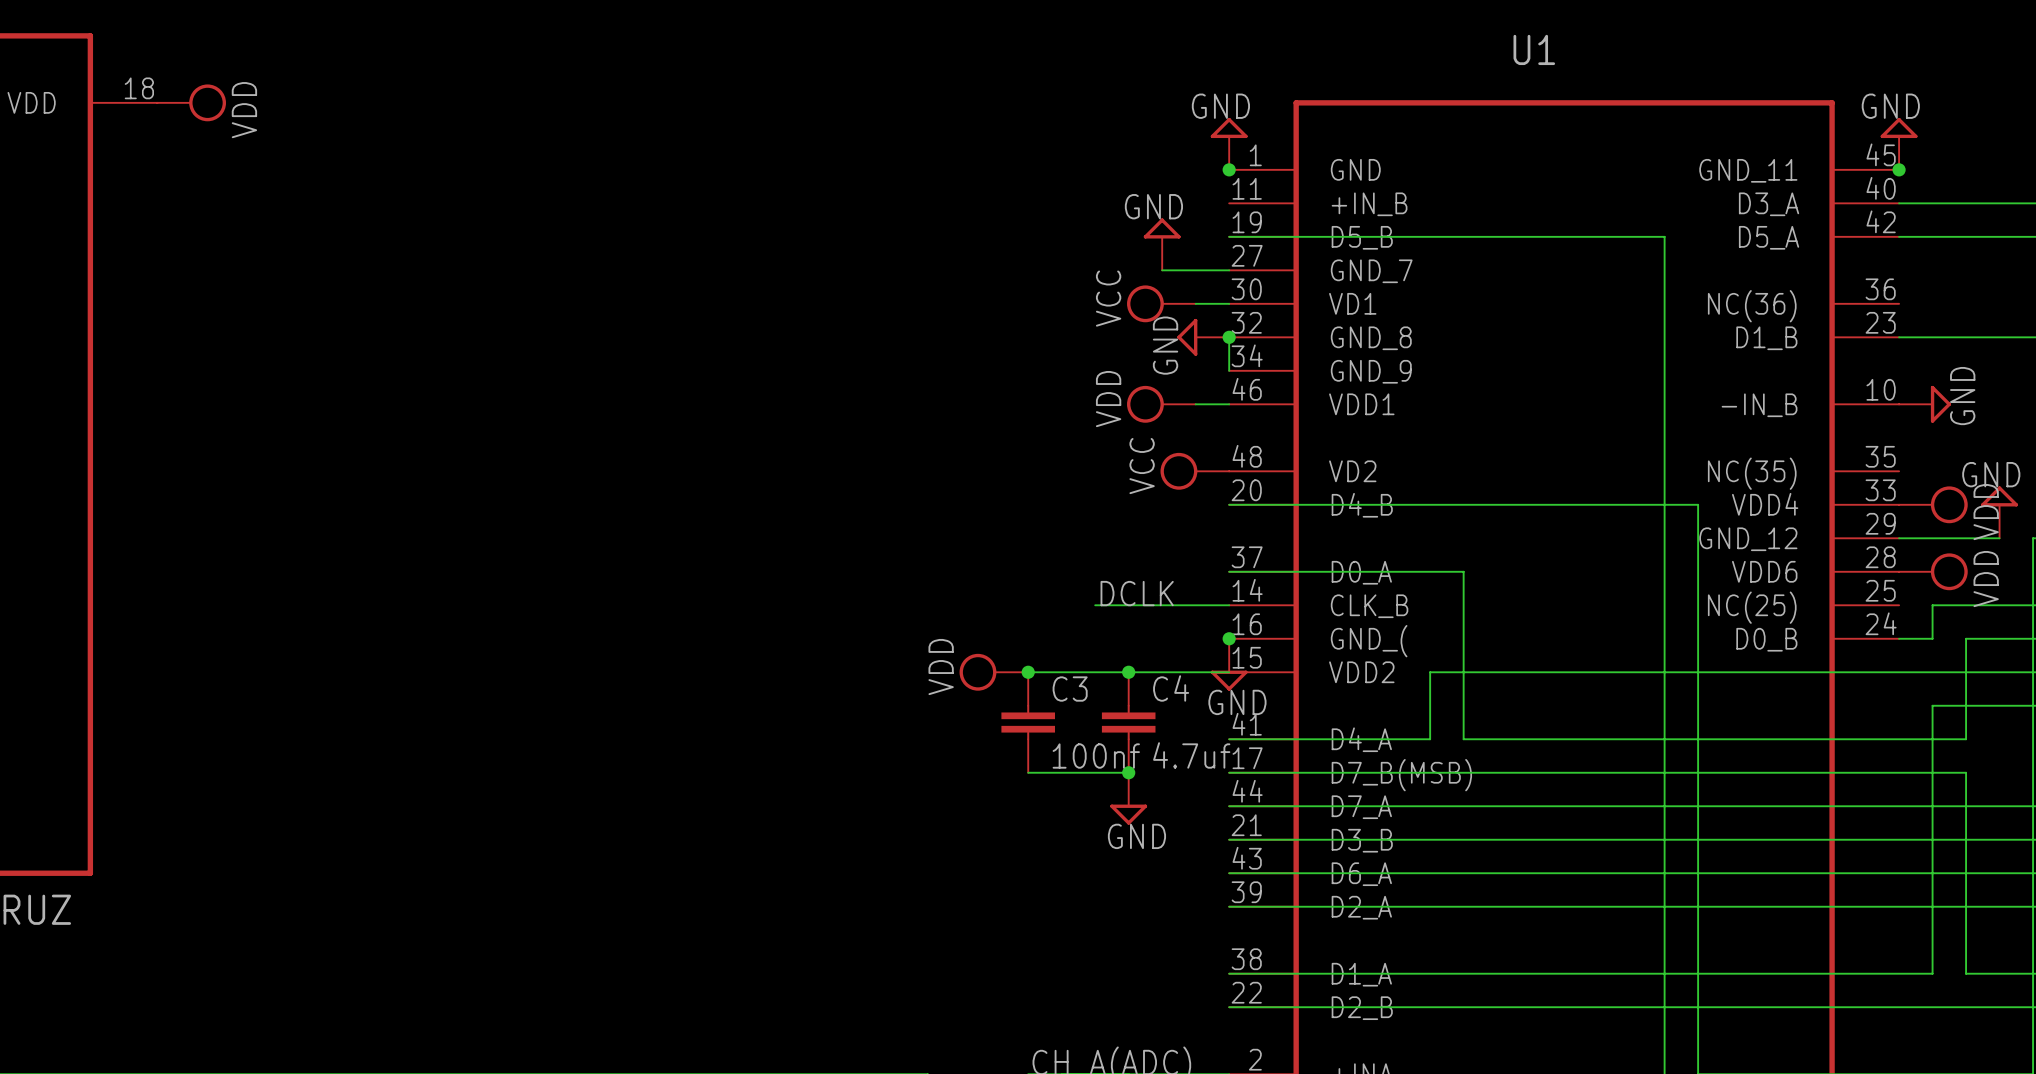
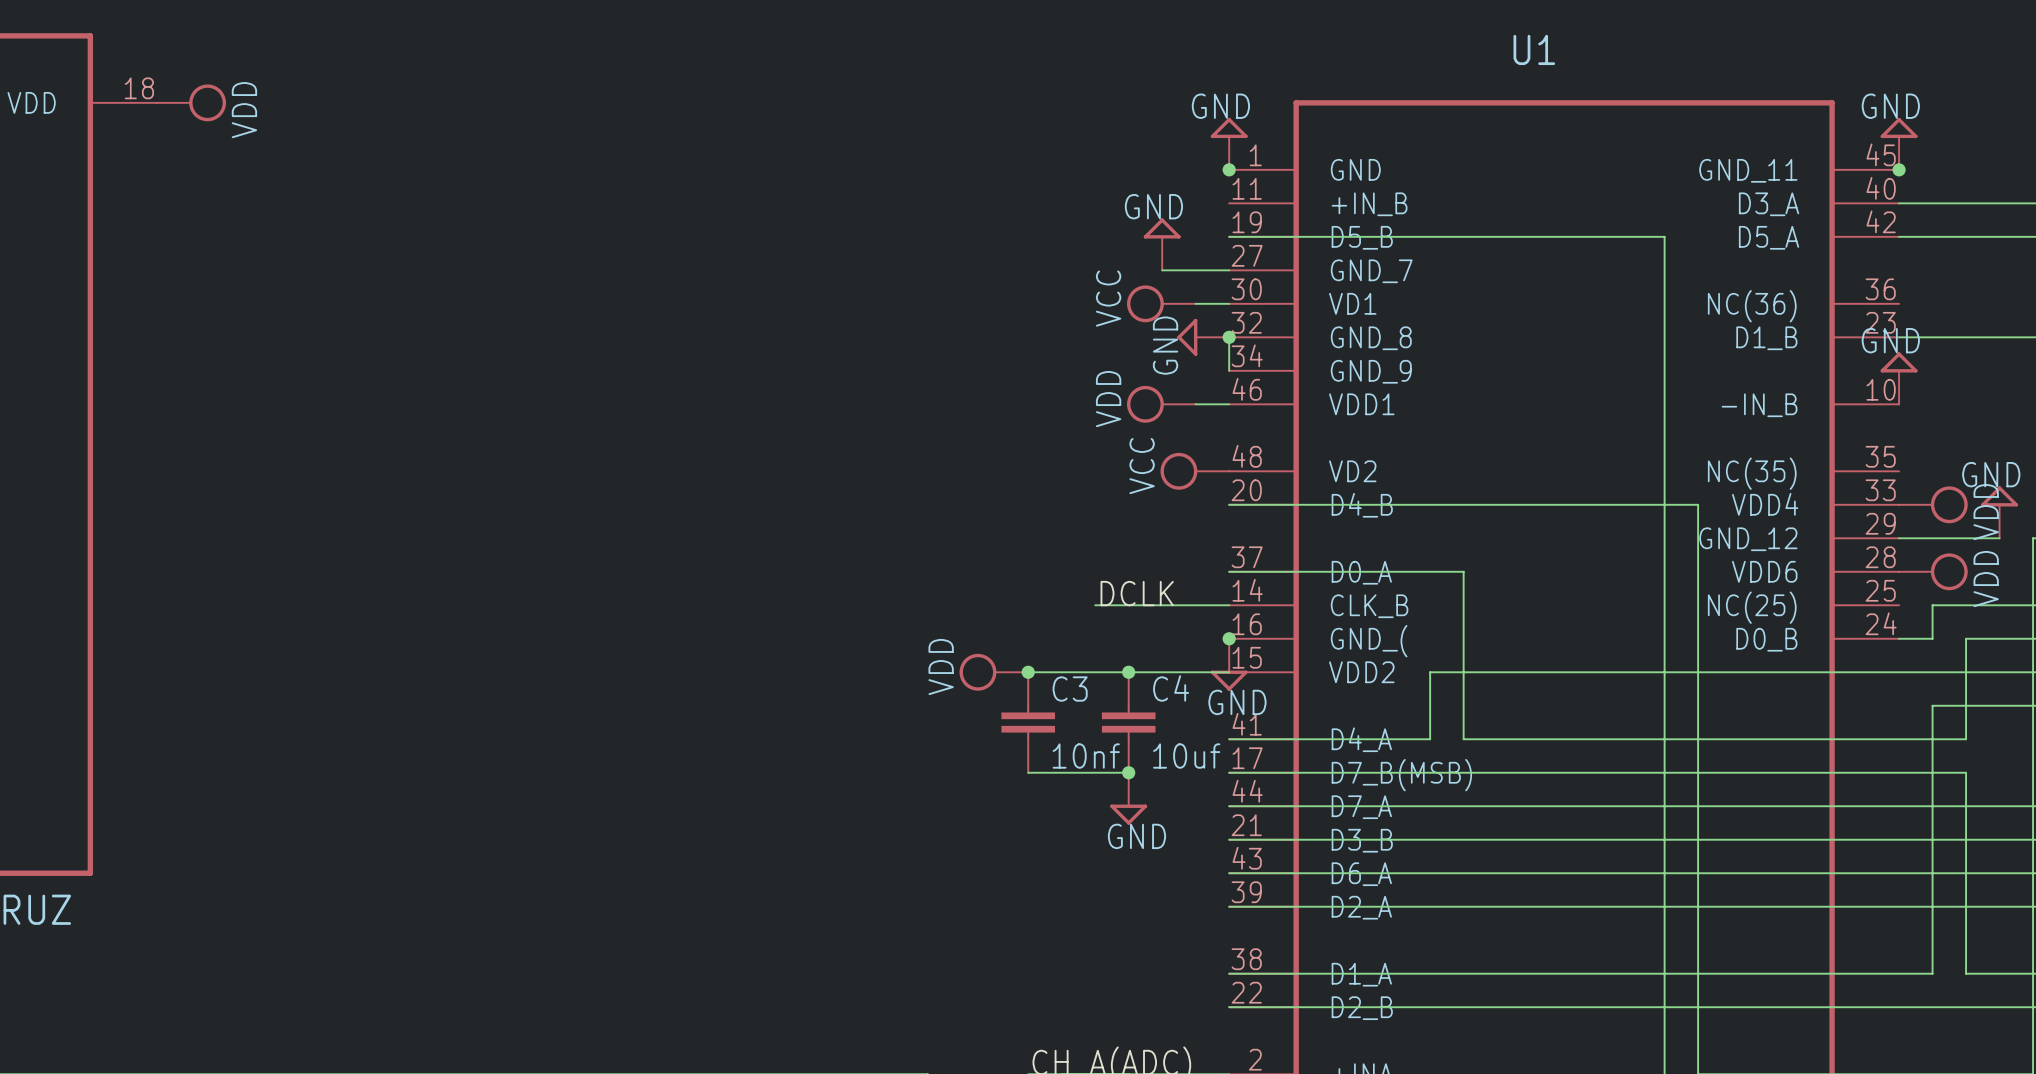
power symbol position: GND (1925, 404) -> GND (1899, 378)
power symbol rotation: 0° (1940, 404) -> 90° counterclockwise (1899, 362)
C4 value: 4.7uf (1191, 755) -> 10uf (1186, 756)
C3 value: 100nf (1096, 756) -> 10nf (1086, 756)

